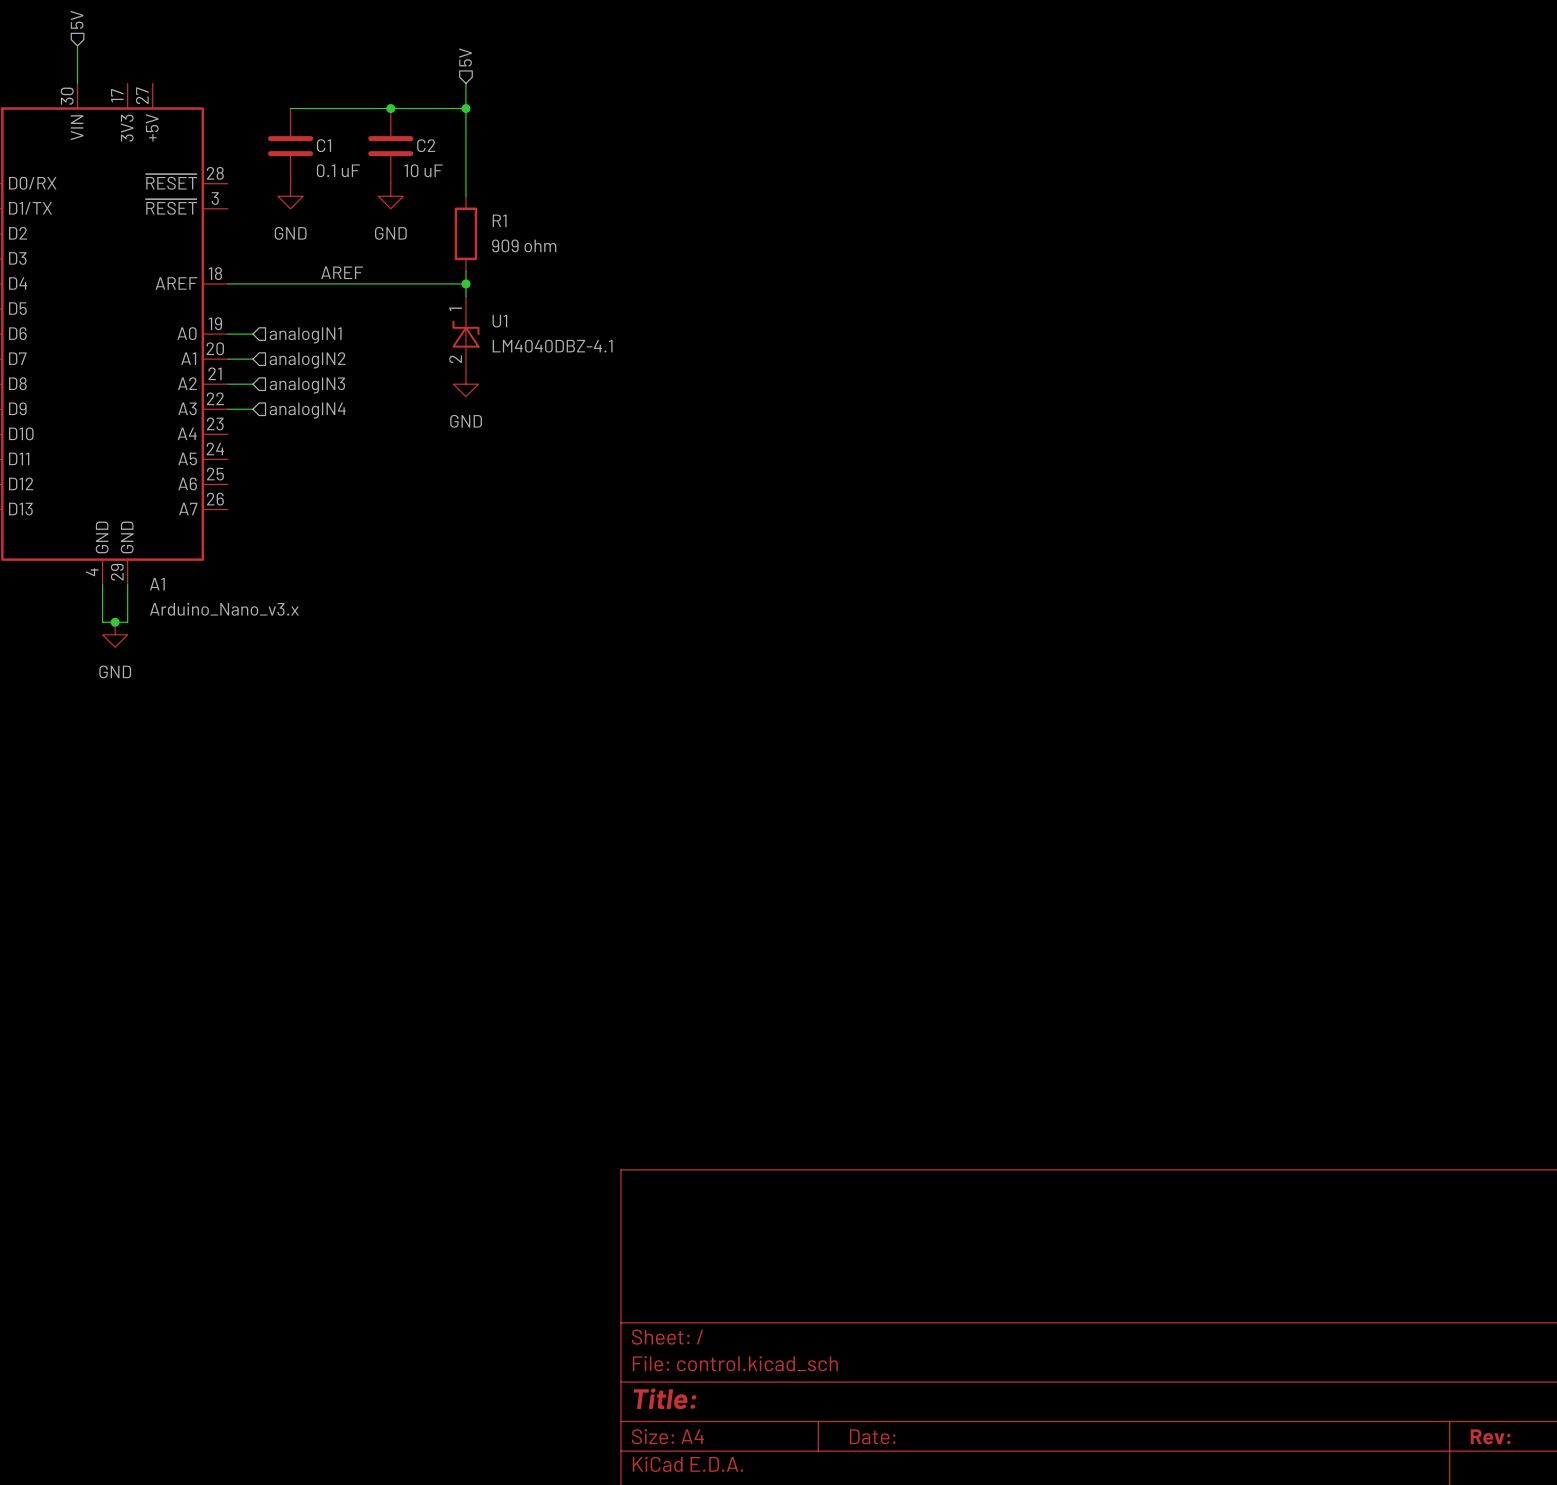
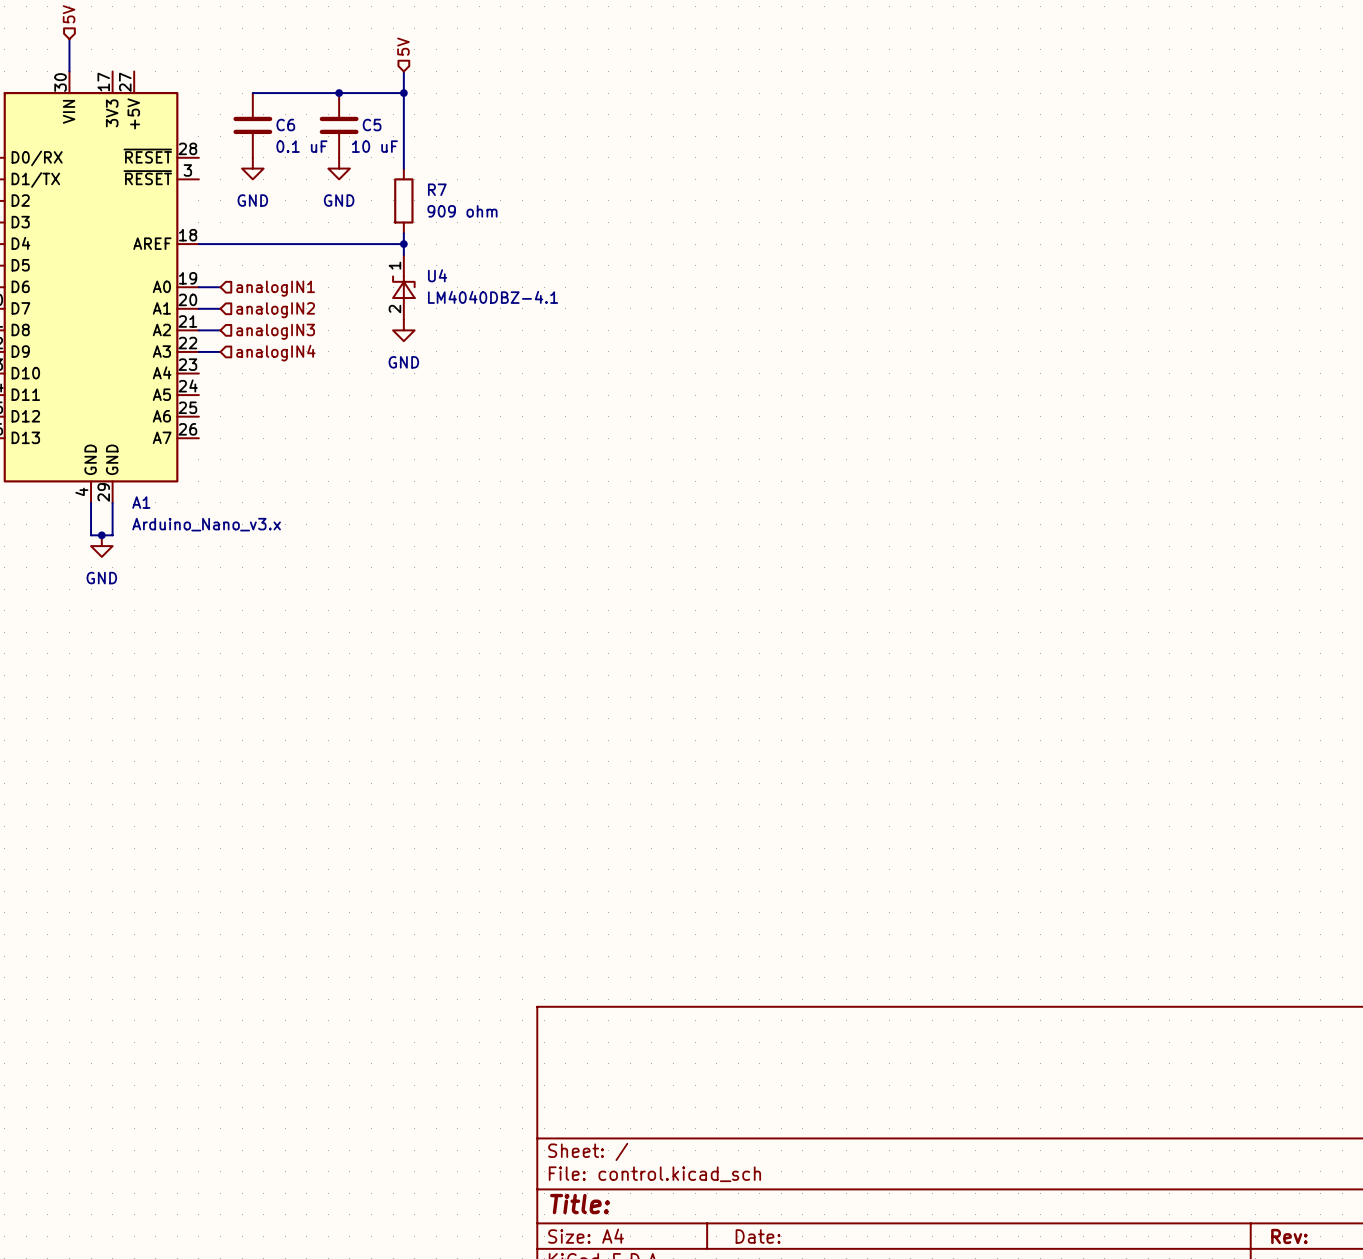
C1 name: C1 (323, 145) -> C6 (285, 125)
C2 name: C2 (426, 145) -> C5 (372, 125)
R1 name: R1 (499, 220) -> R7 (437, 189)
label: AREF (342, 272) -> none
U1 name: U1 (499, 321) -> U4 (437, 275)

